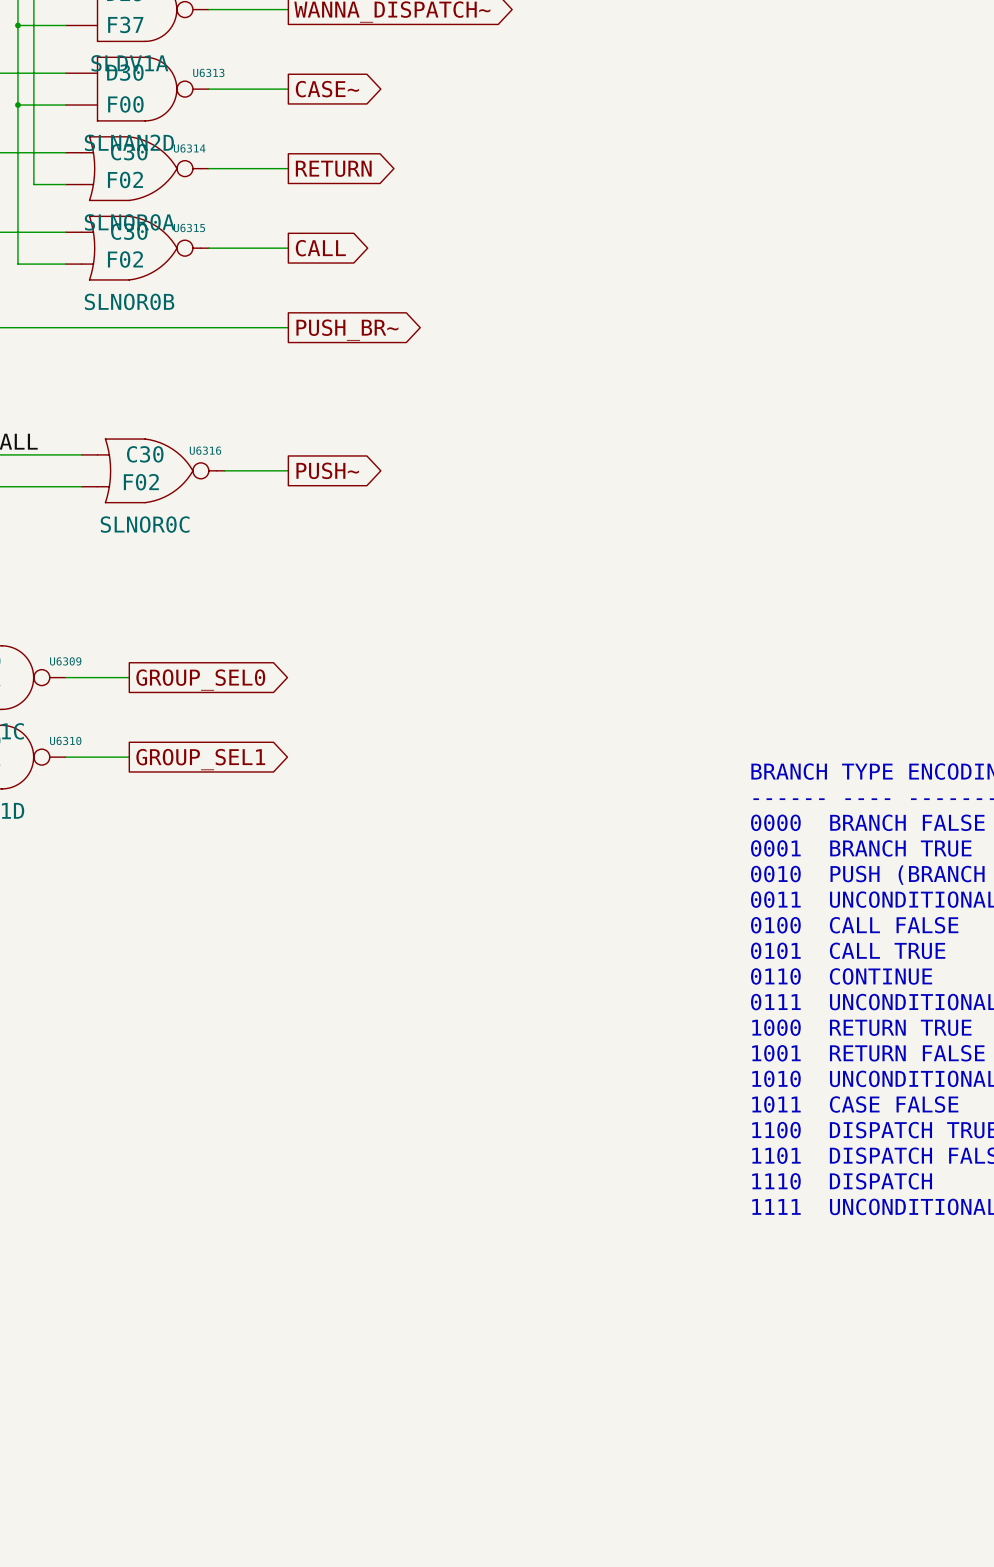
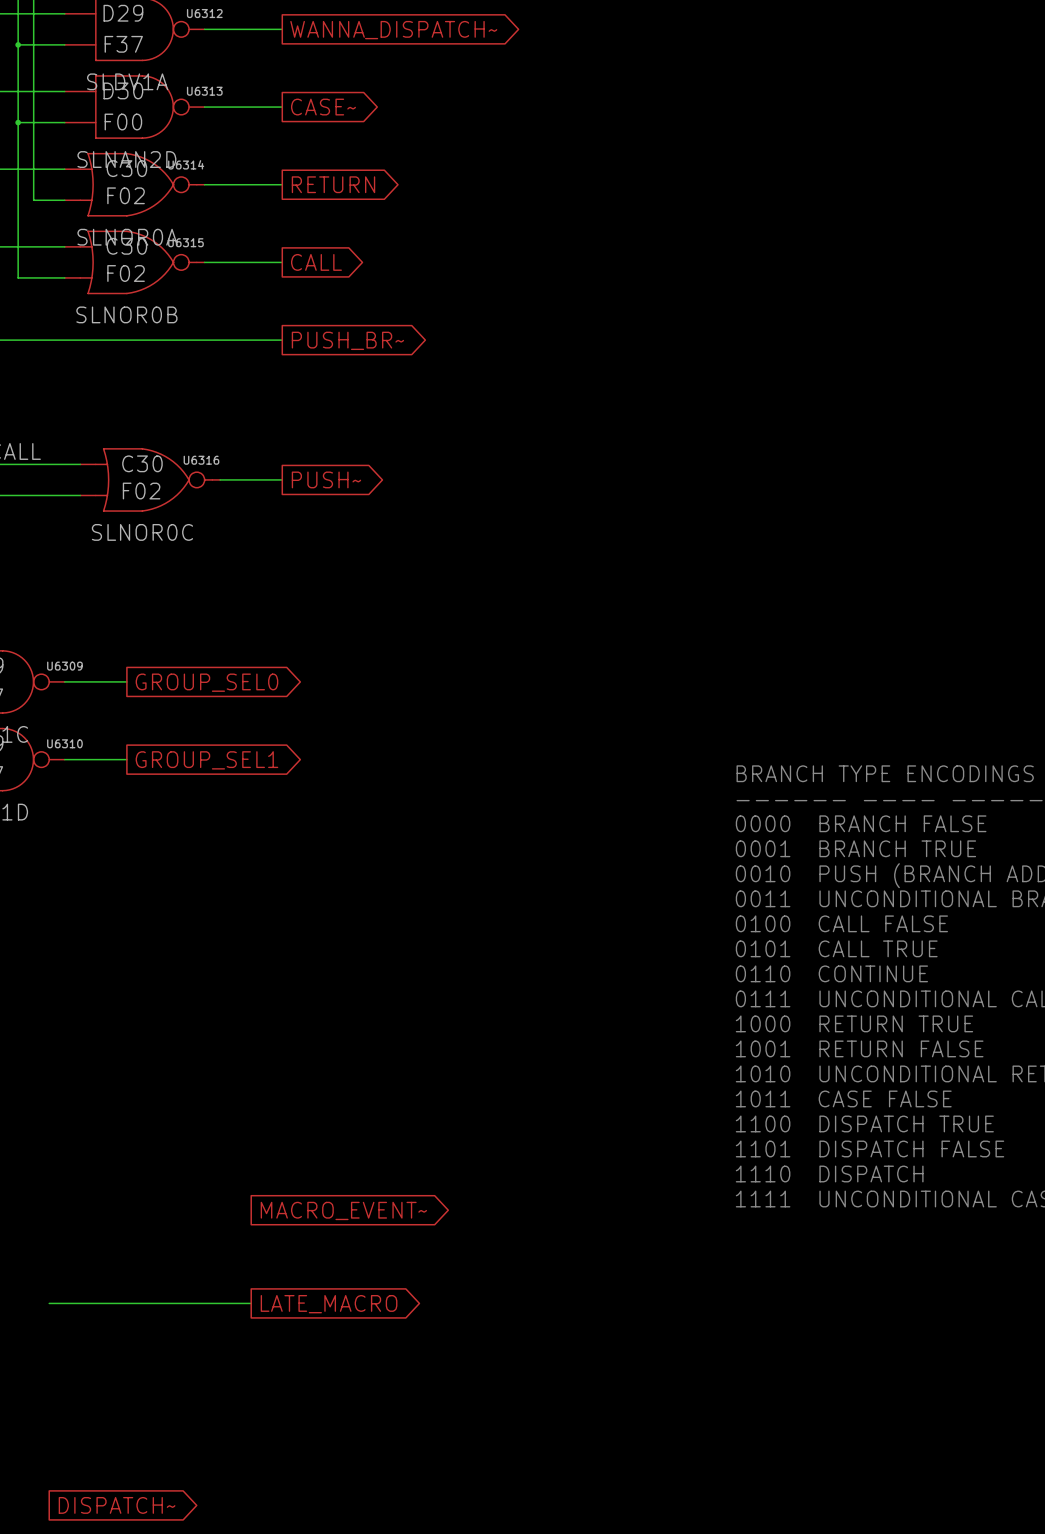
global label: none -> MACRO_EVENT~ (343, 1210)
wire: none -> (49, 1303) (251, 1303)
global label: none -> LATE_MACRO (329, 1304)
global label: none -> DISPATCH~ (117, 1505)

